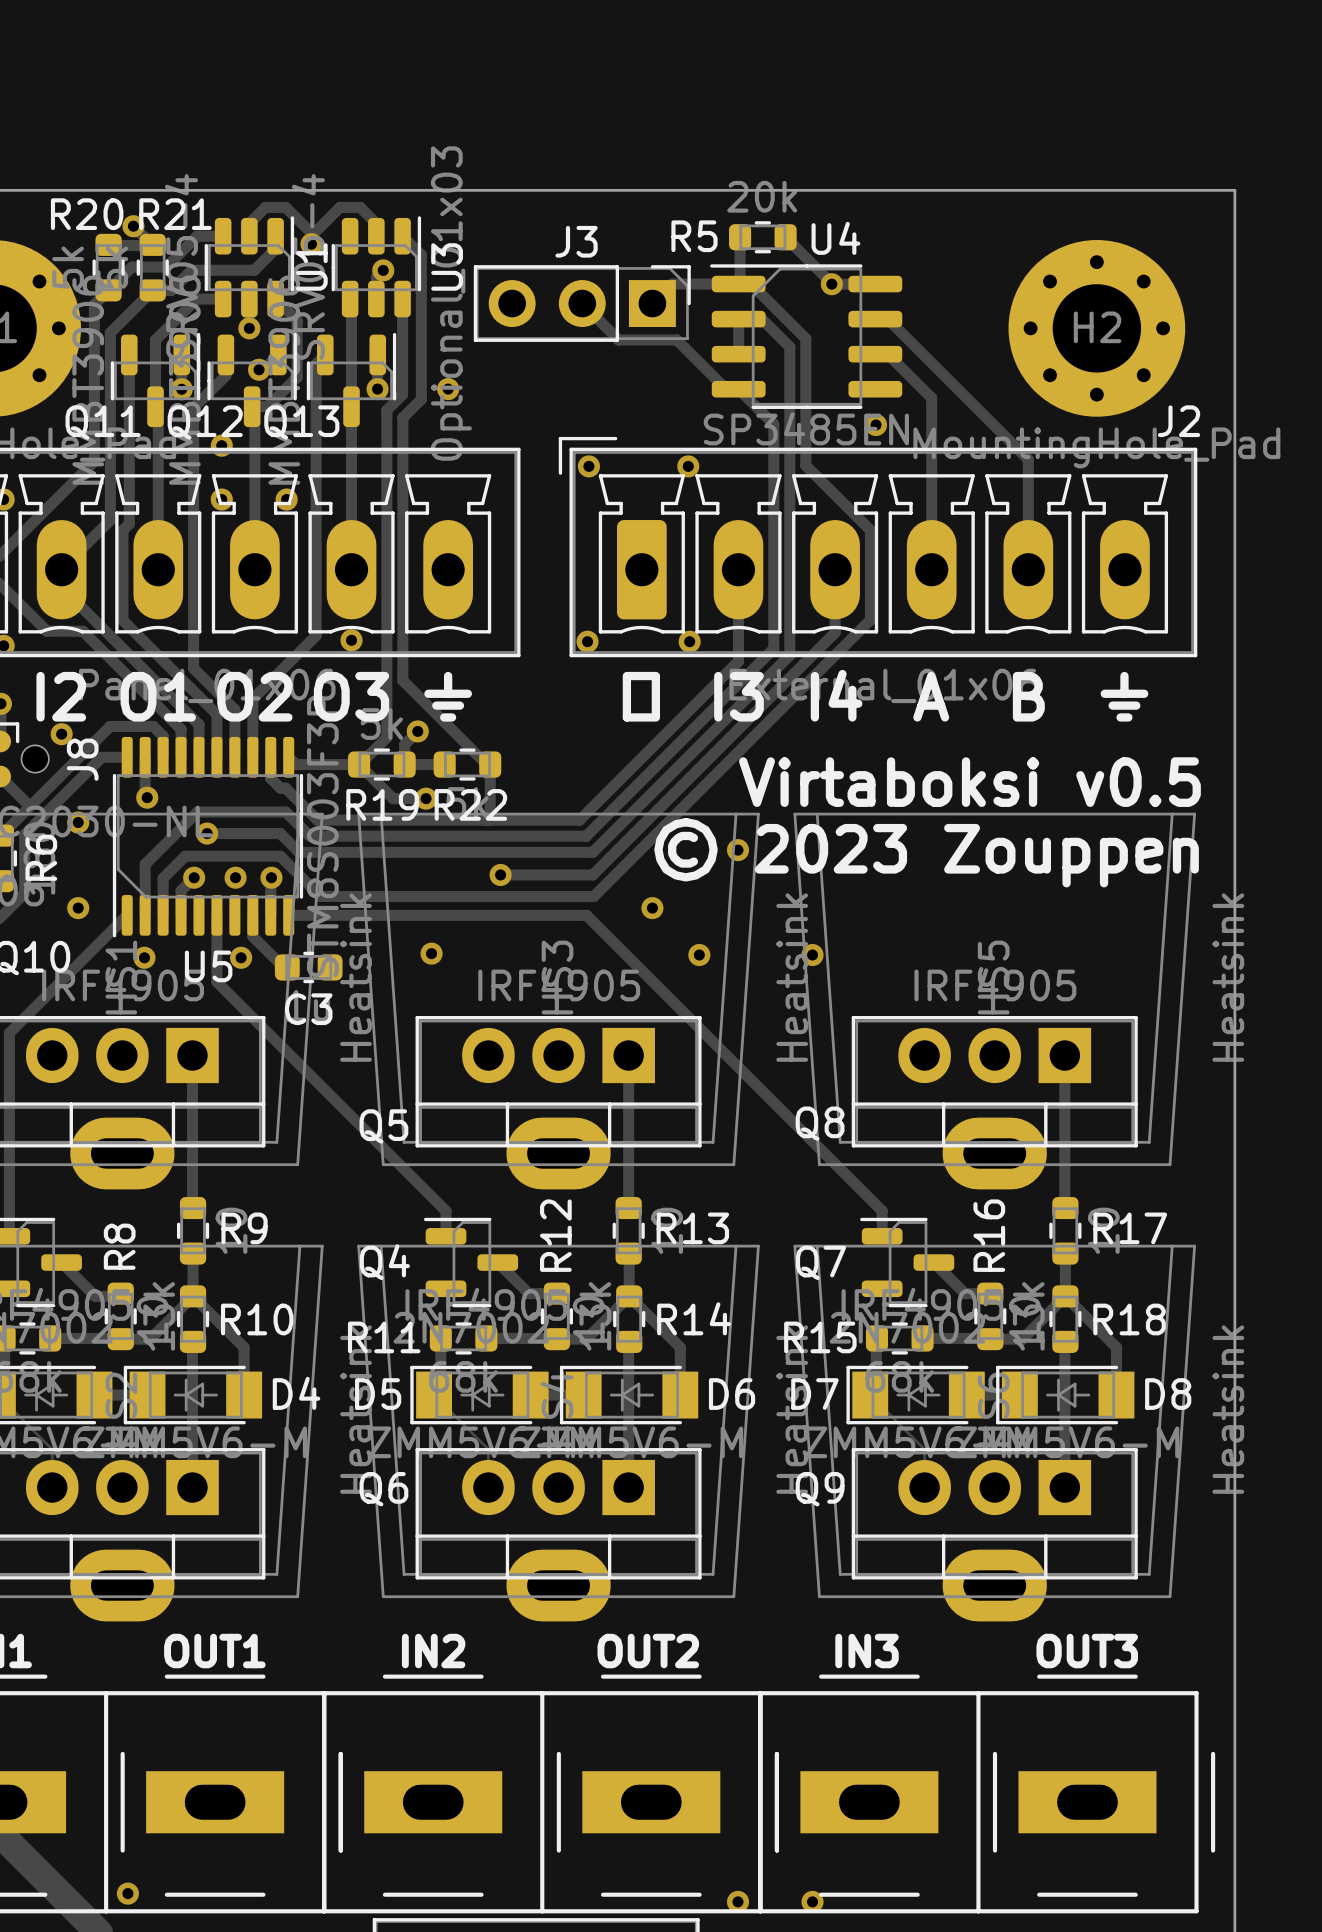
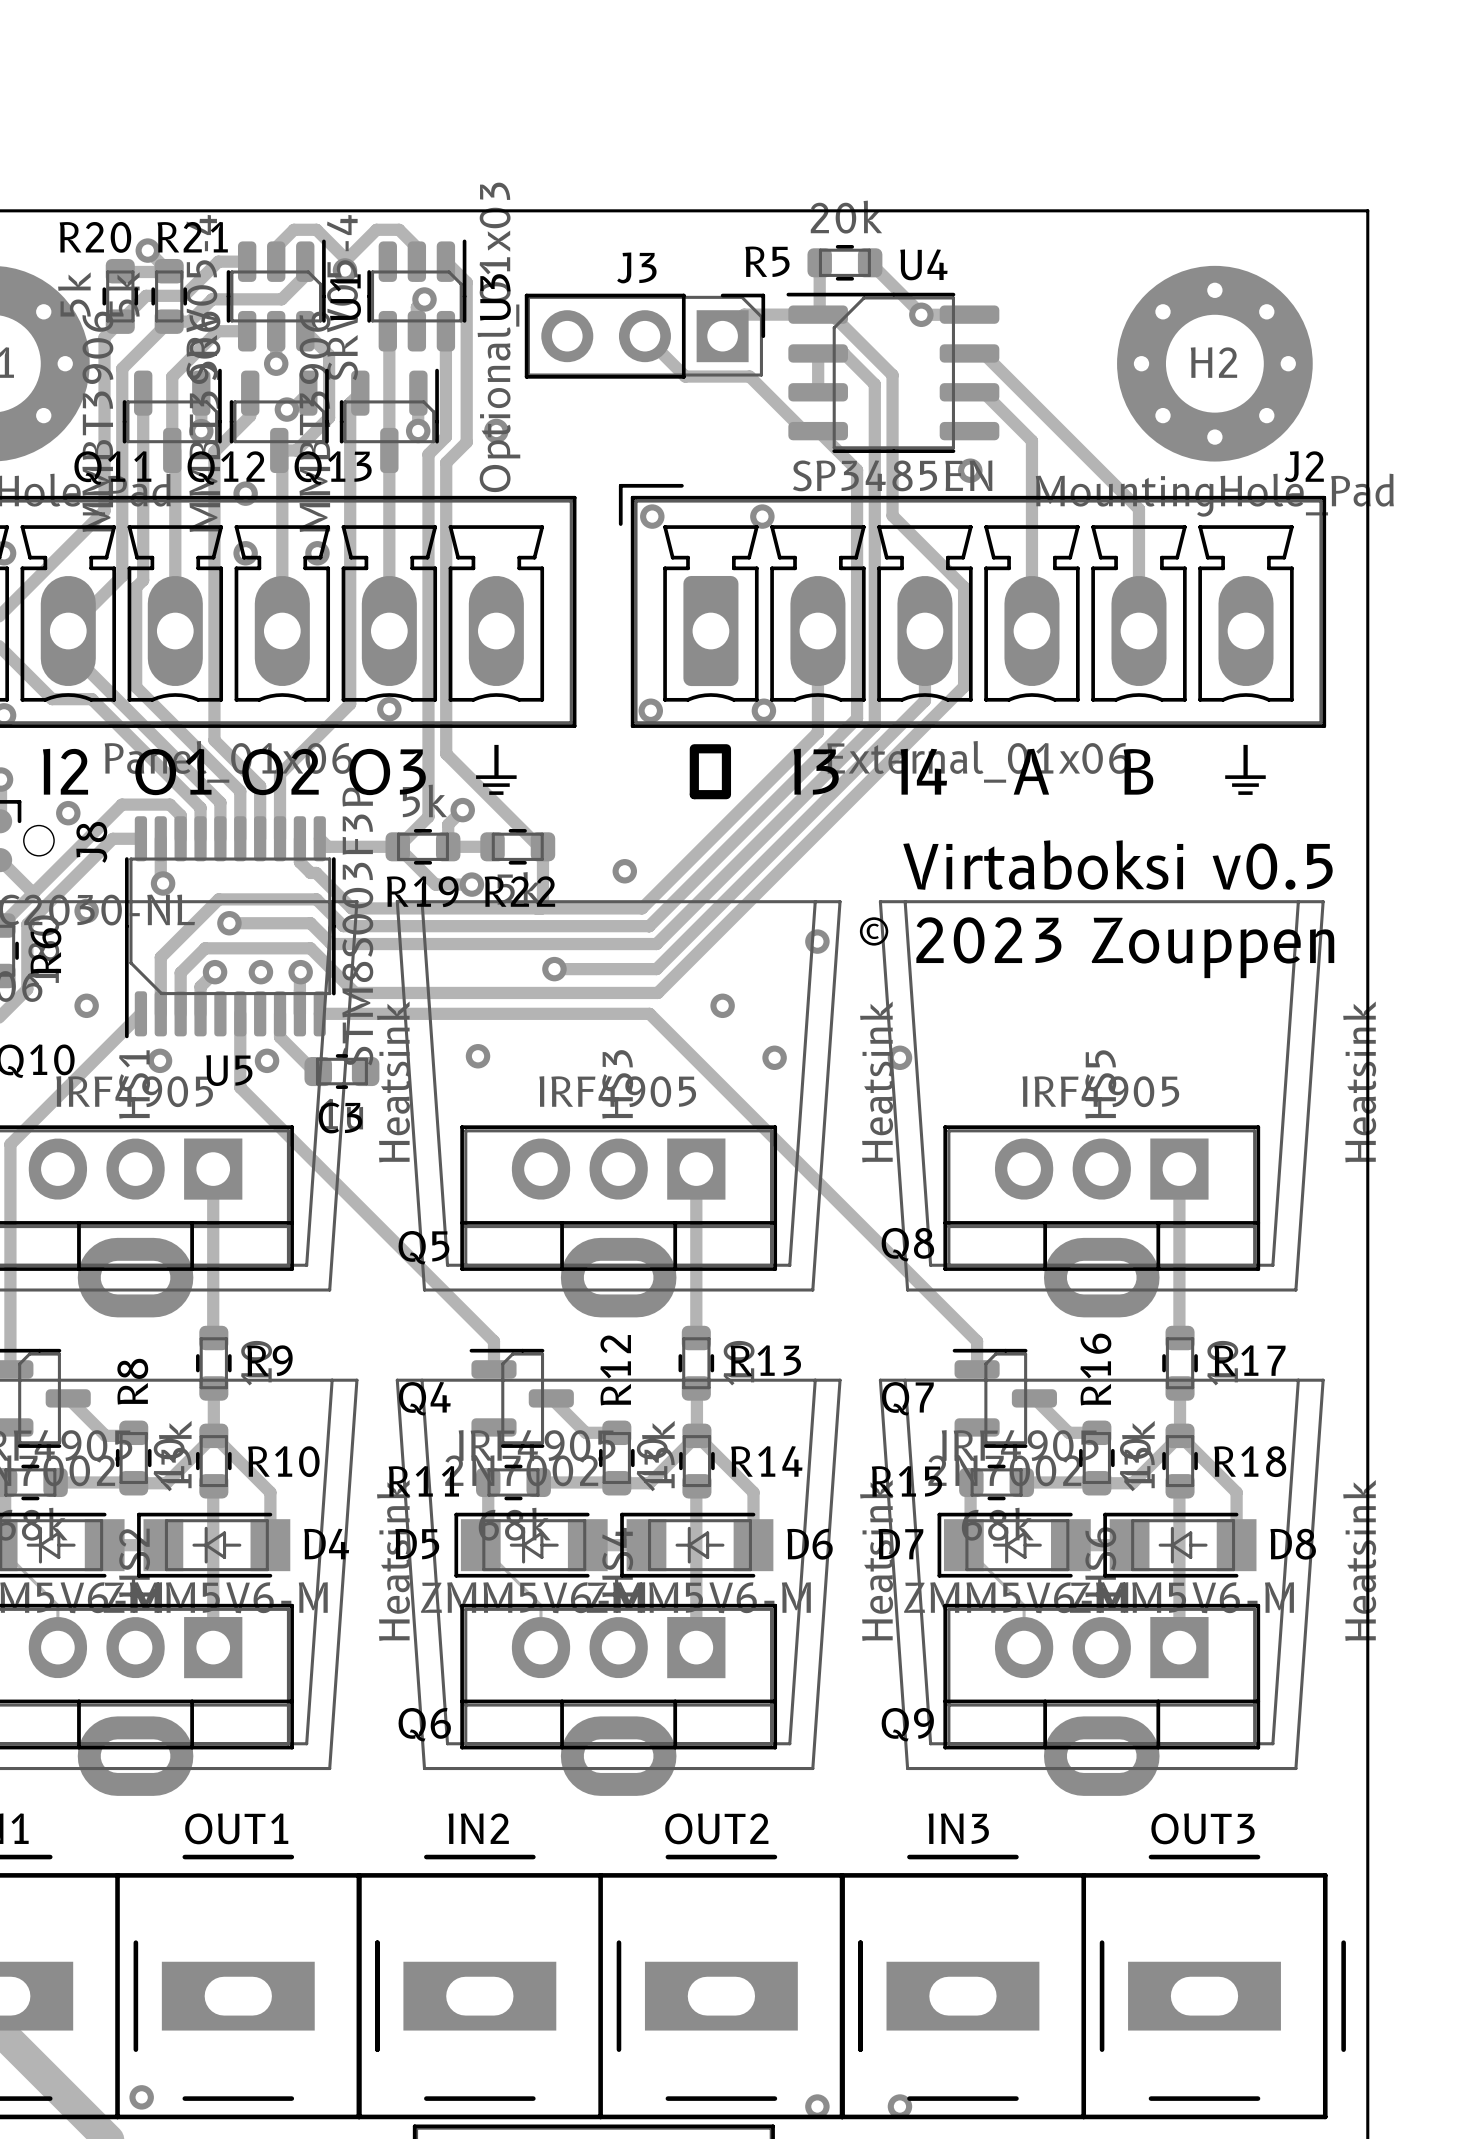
via: none -> (624, 871)
Q6 name position: Q6 (383, 1489) -> Q6 (424, 1724)
Q9 name position: Q9 (820, 1489) -> Q9 (907, 1724)

